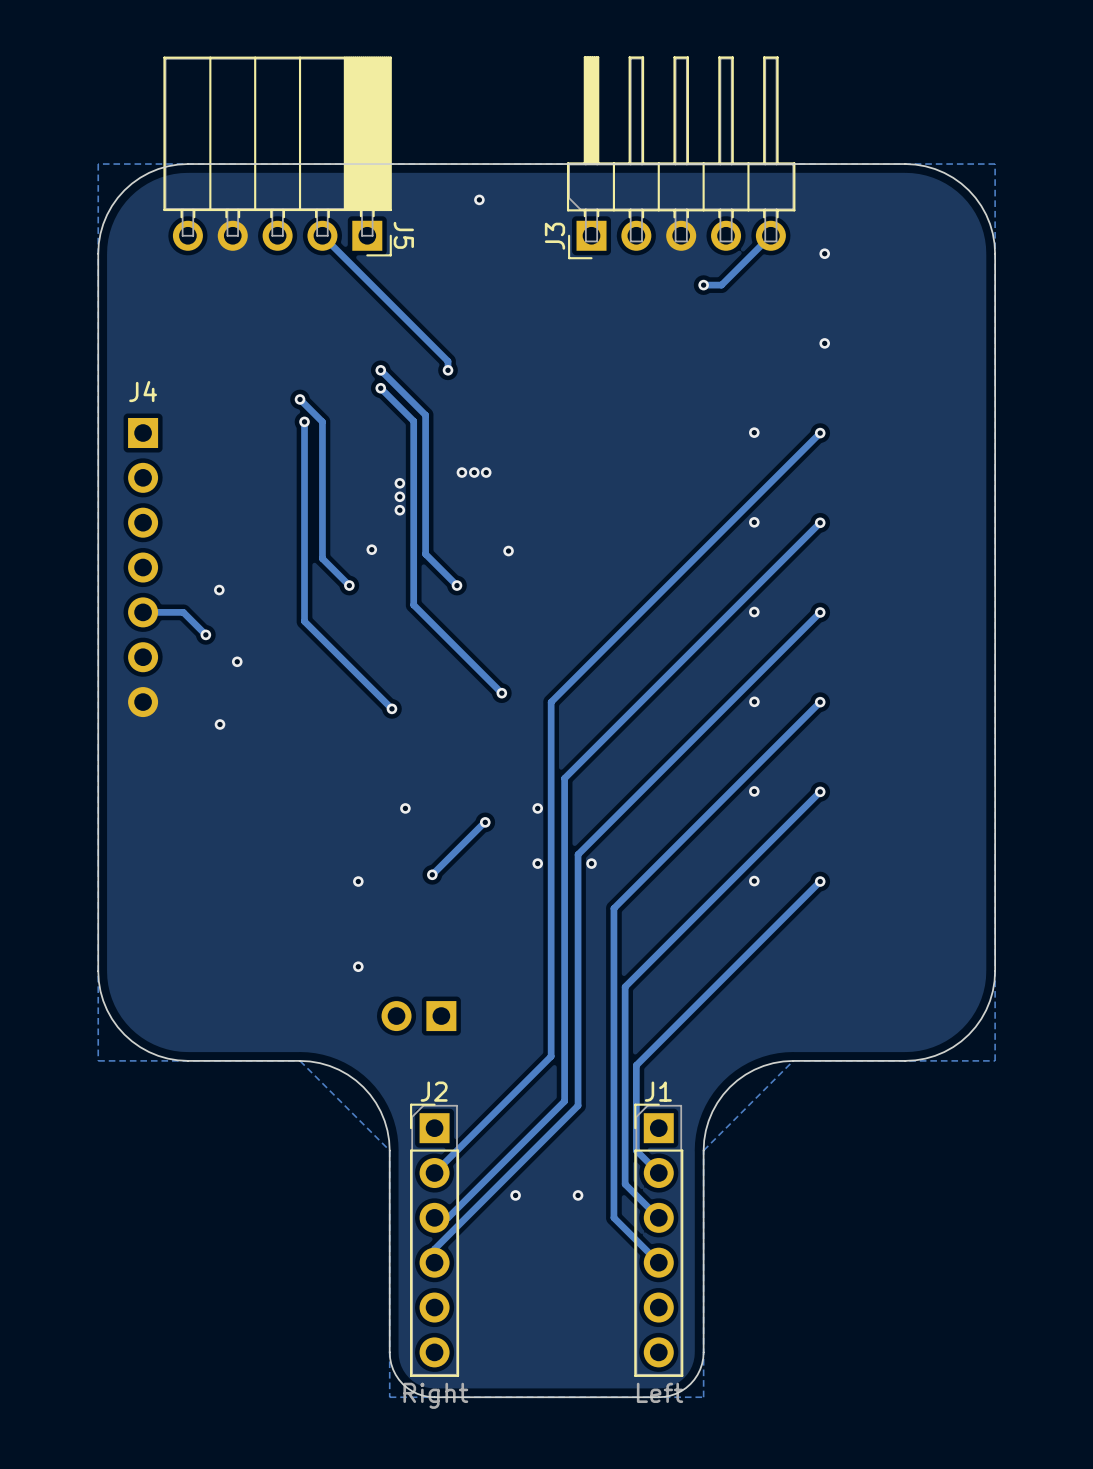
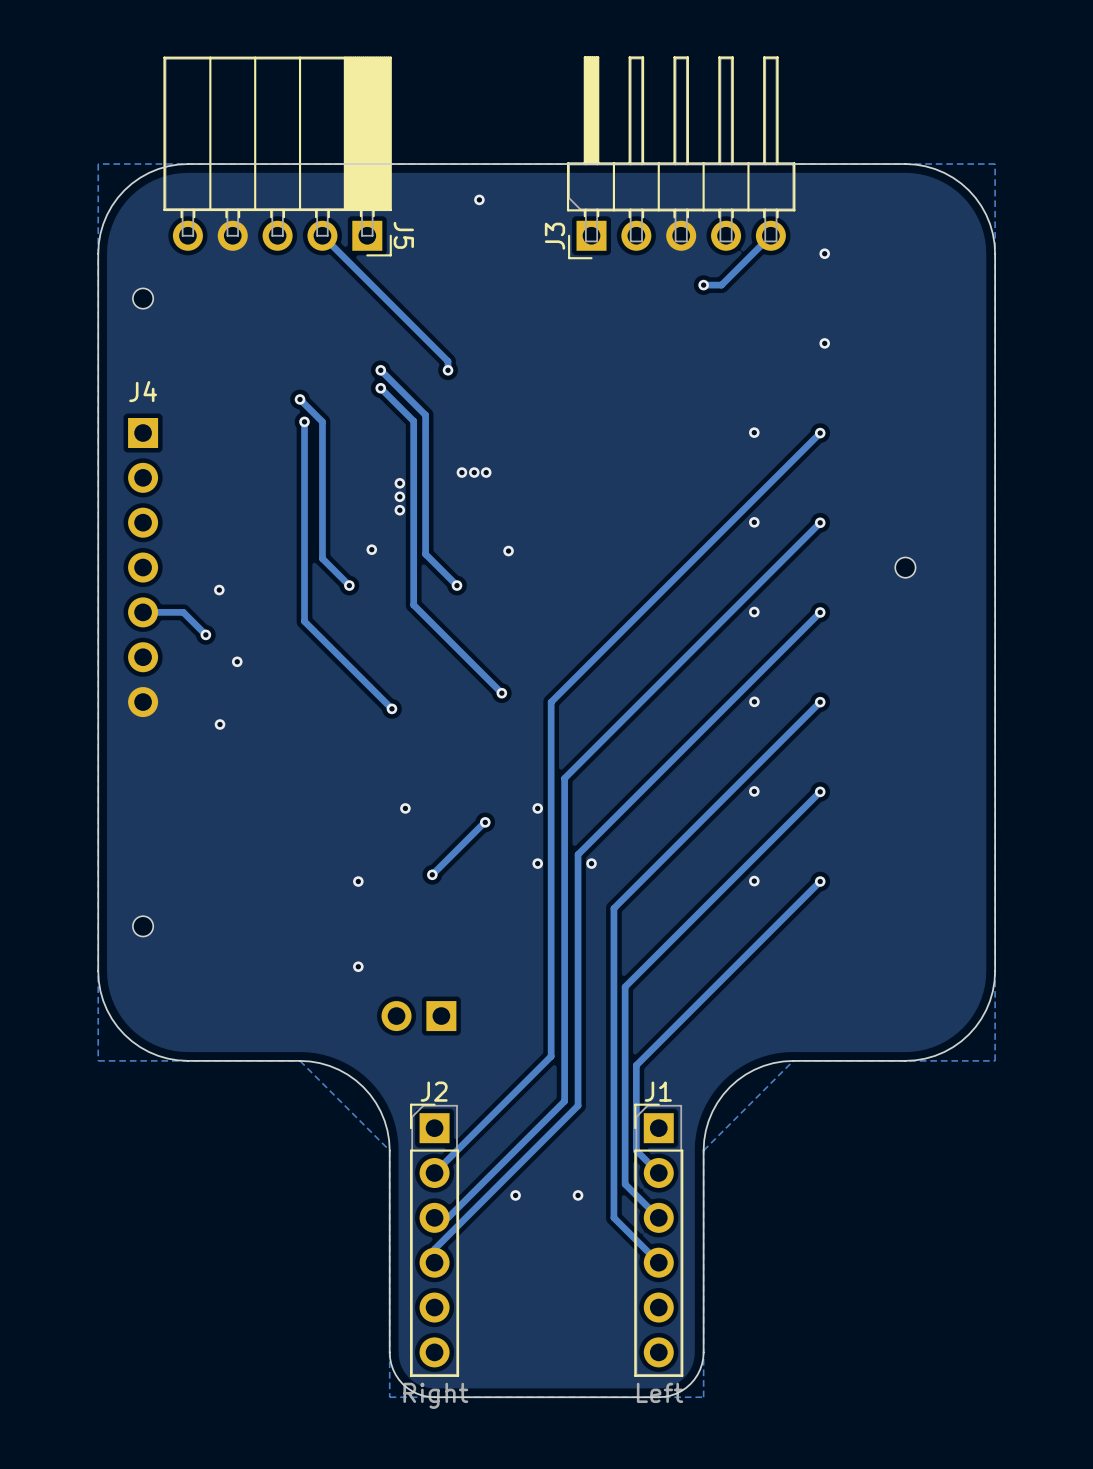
part: none -> (143, 298)
part: none -> (905, 567)
part: none -> (143, 926)

